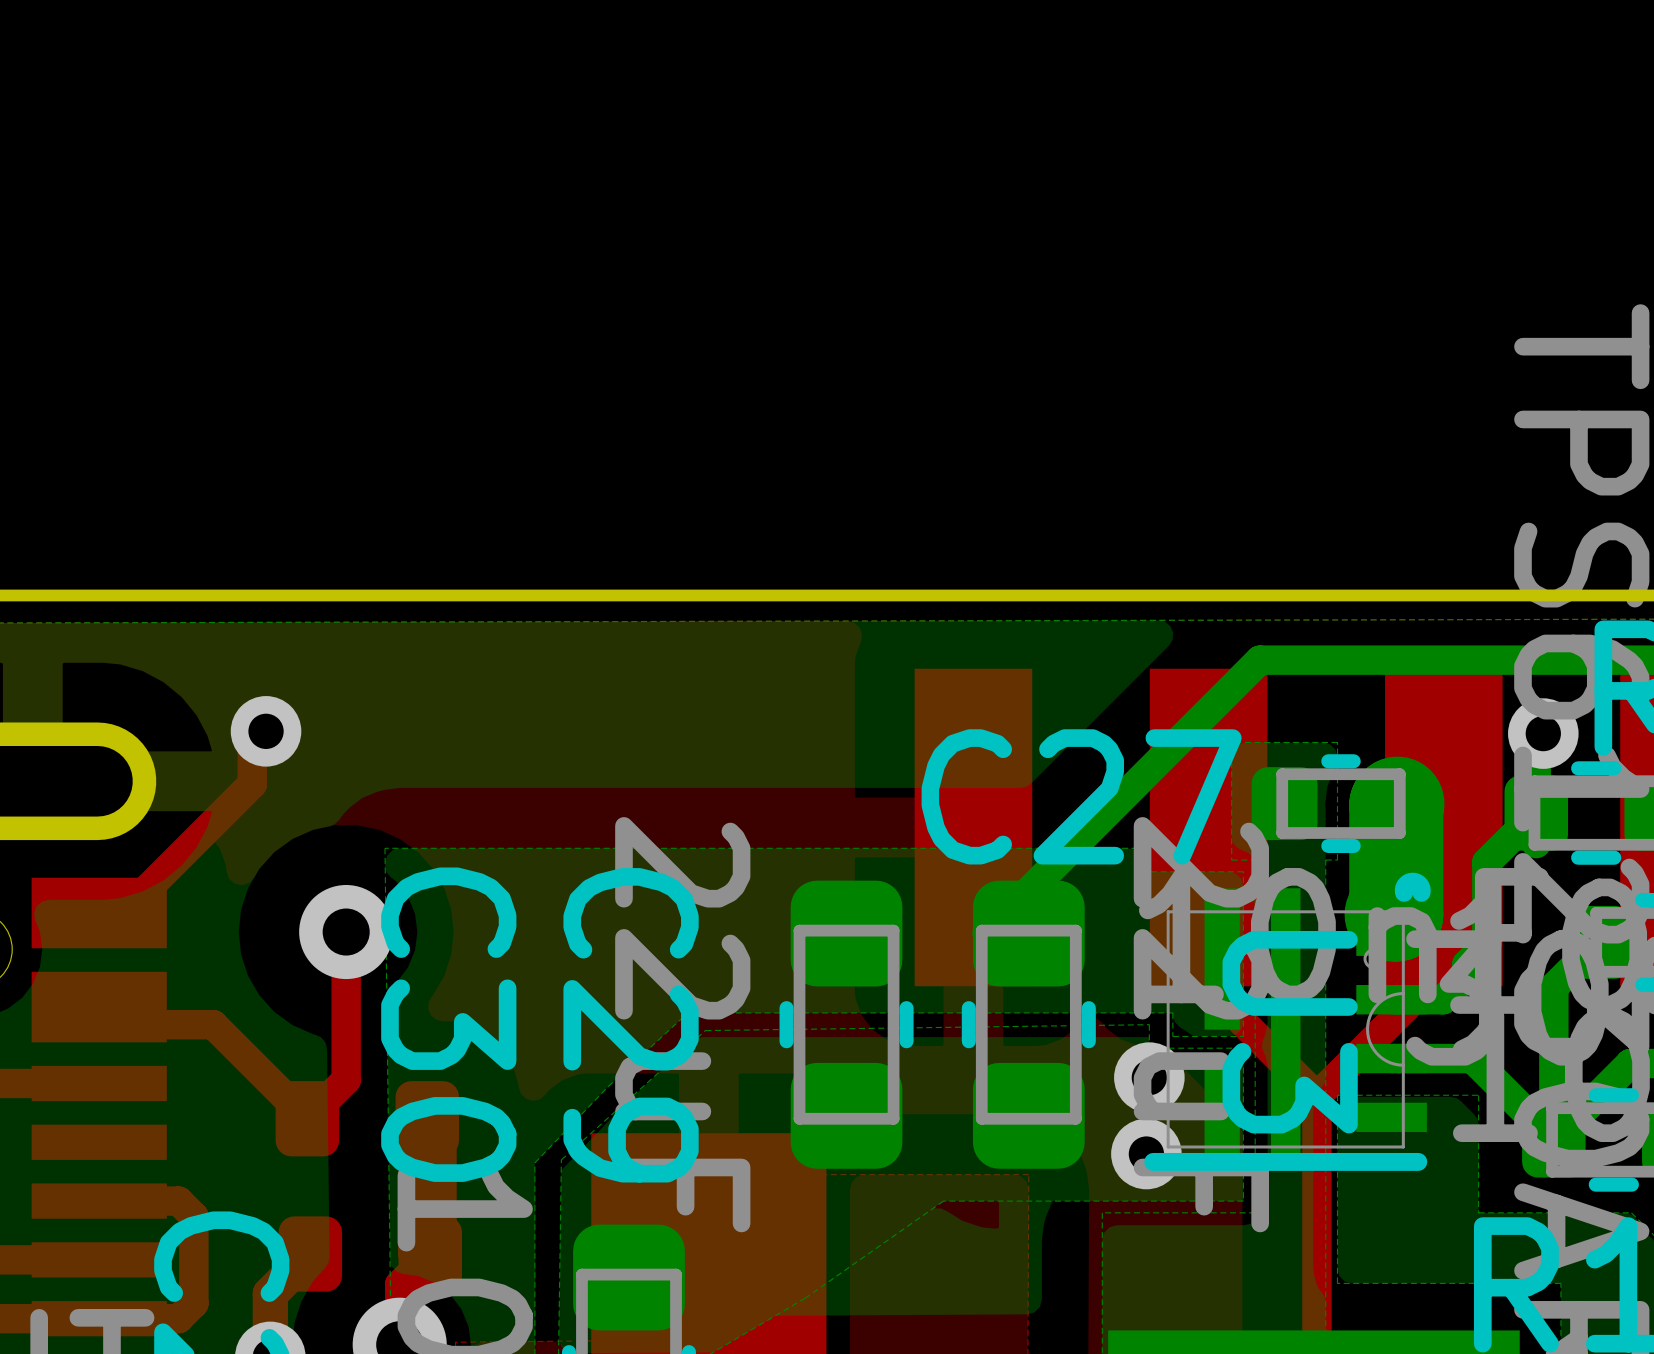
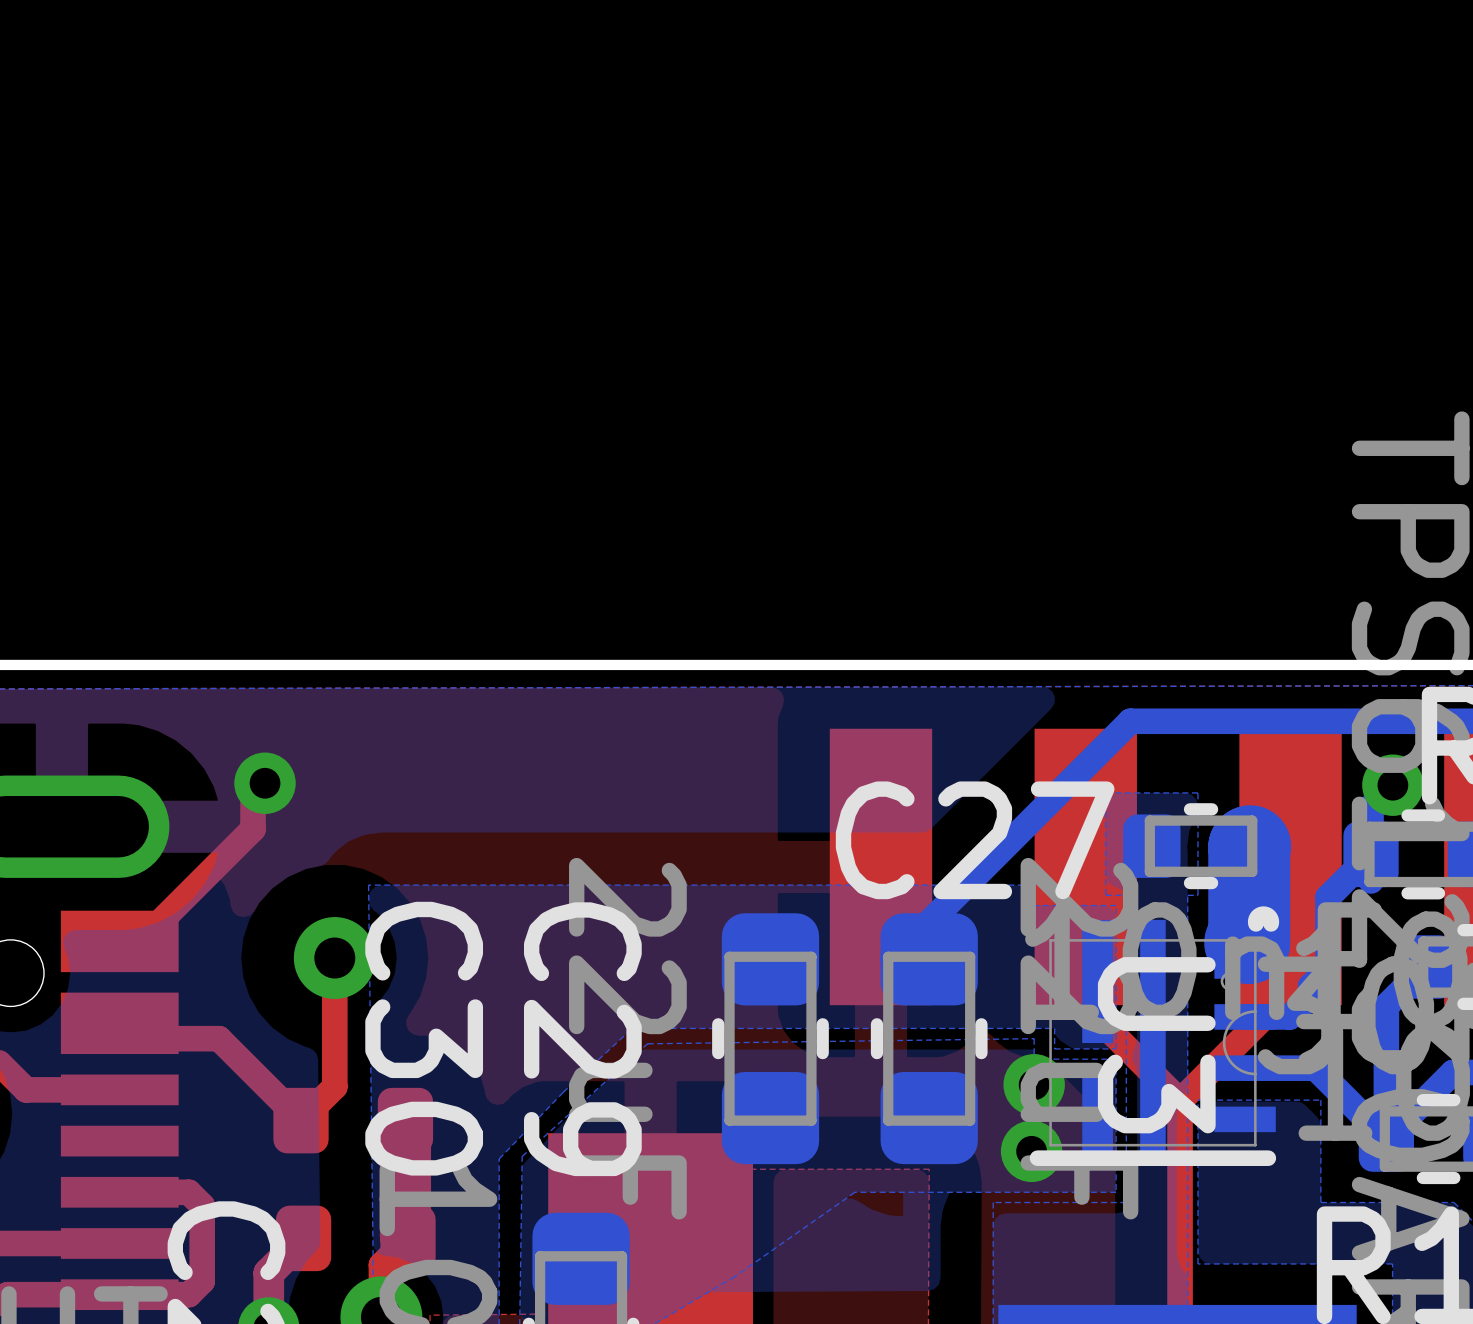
via position: (1543, 733) -> (1392, 785)

